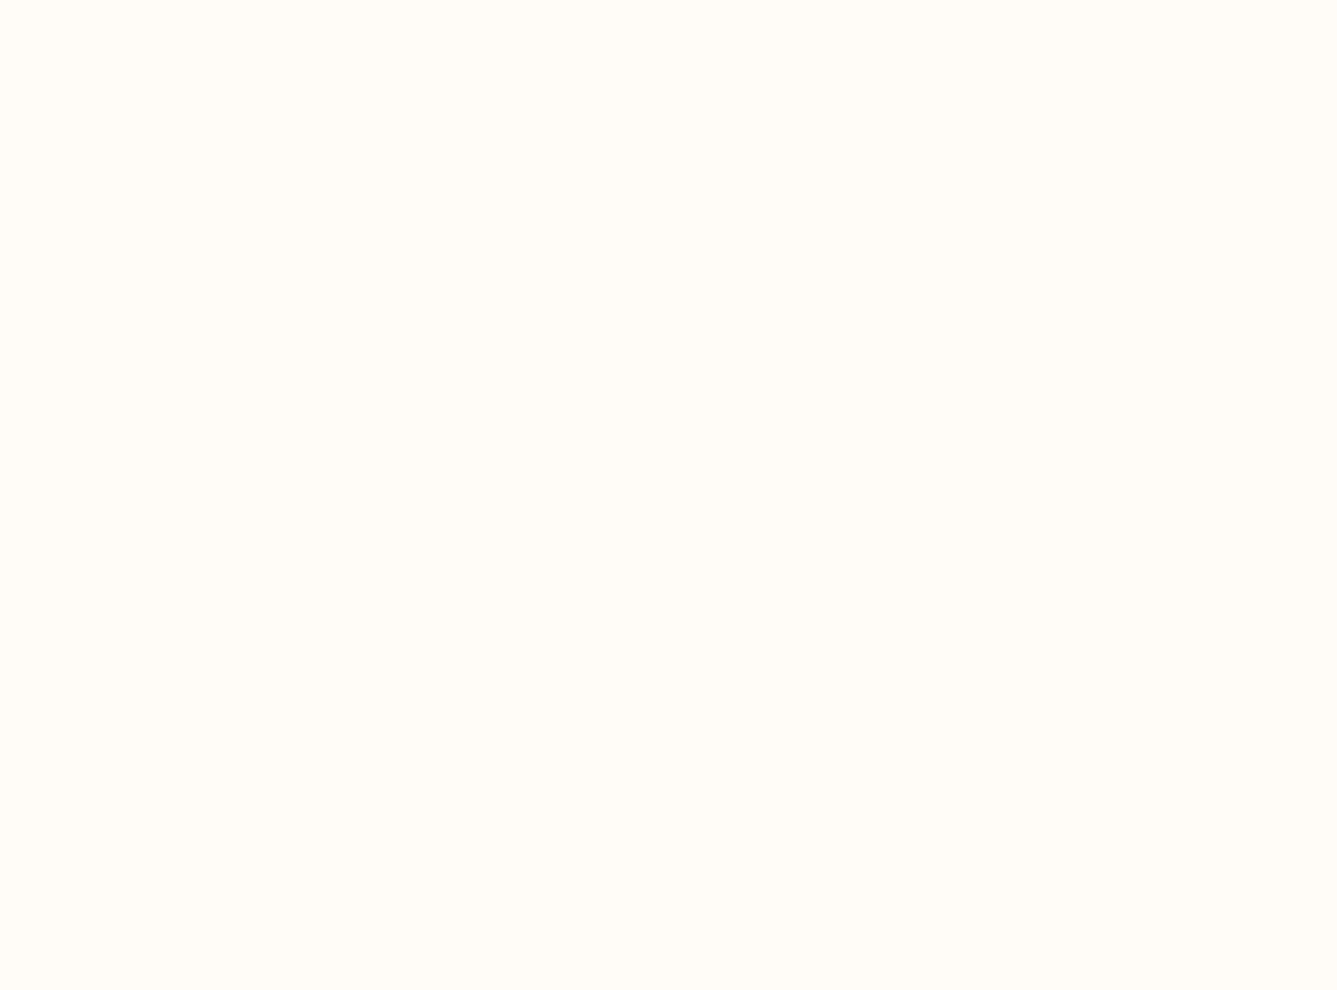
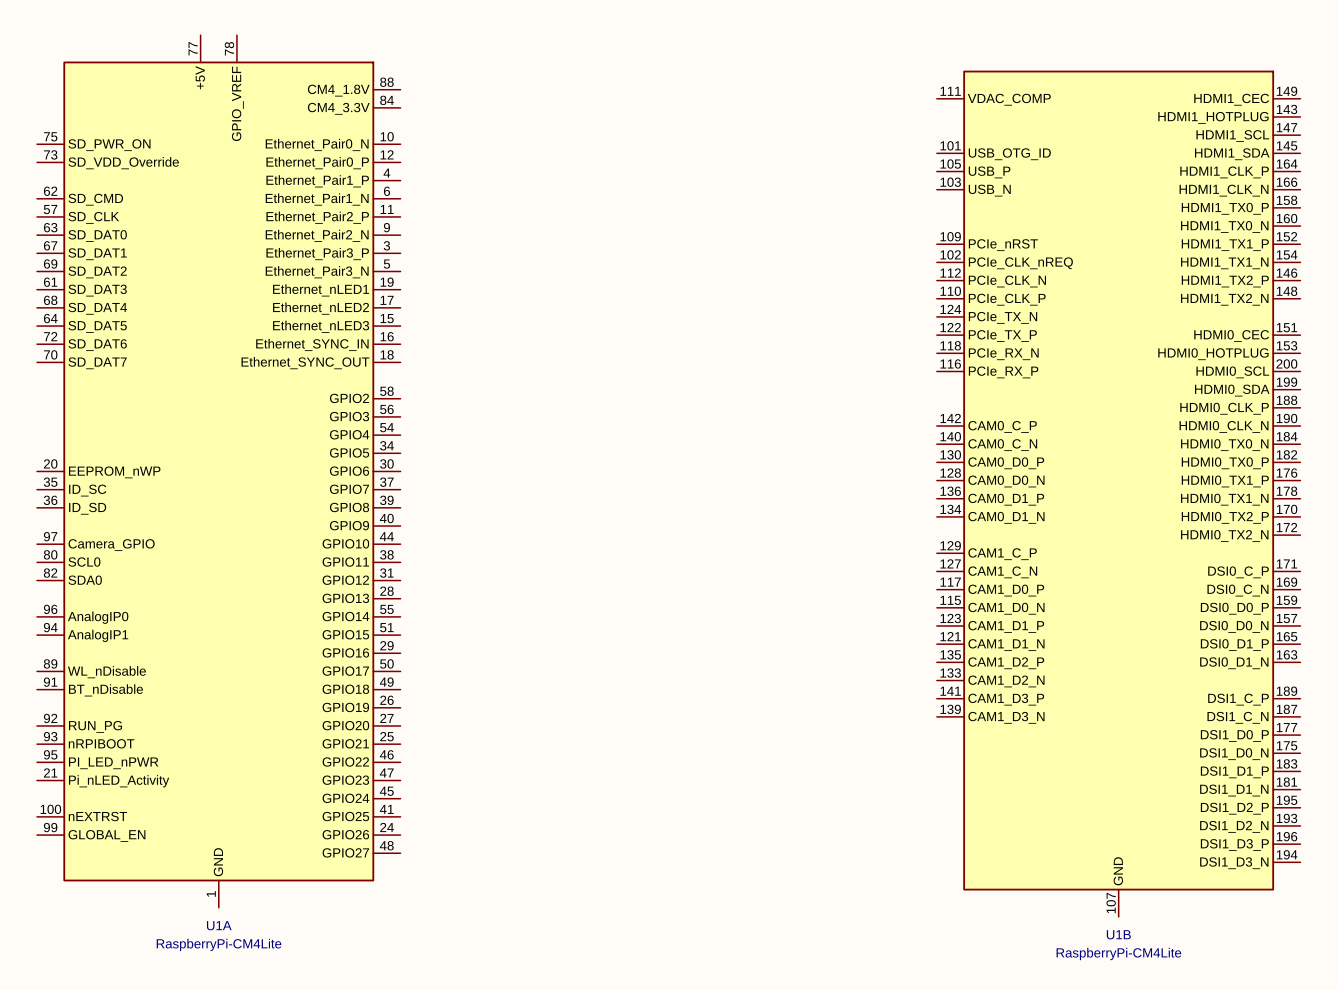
U1A: none -> RaspberryPi-CM4Lite (218, 471)
U1B: none -> RaspberryPi-CM4Lite (1118, 493)

